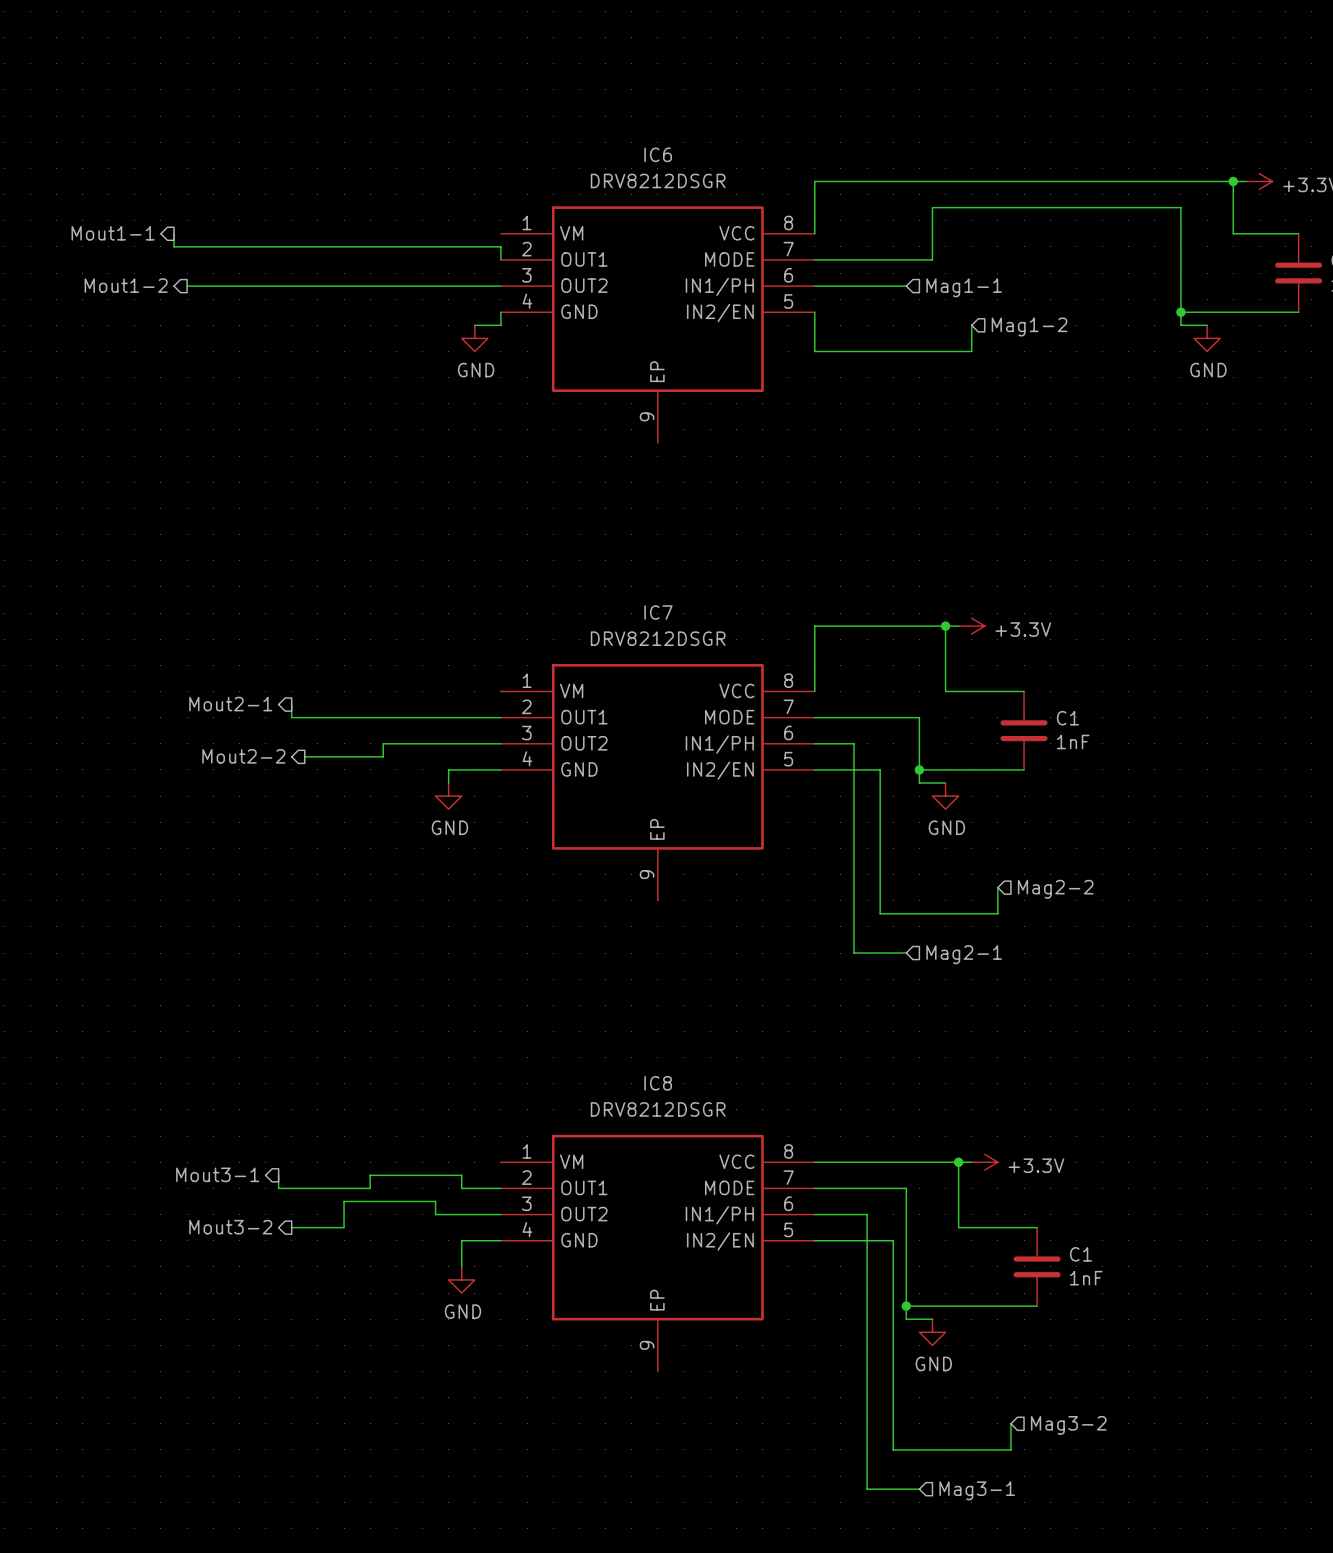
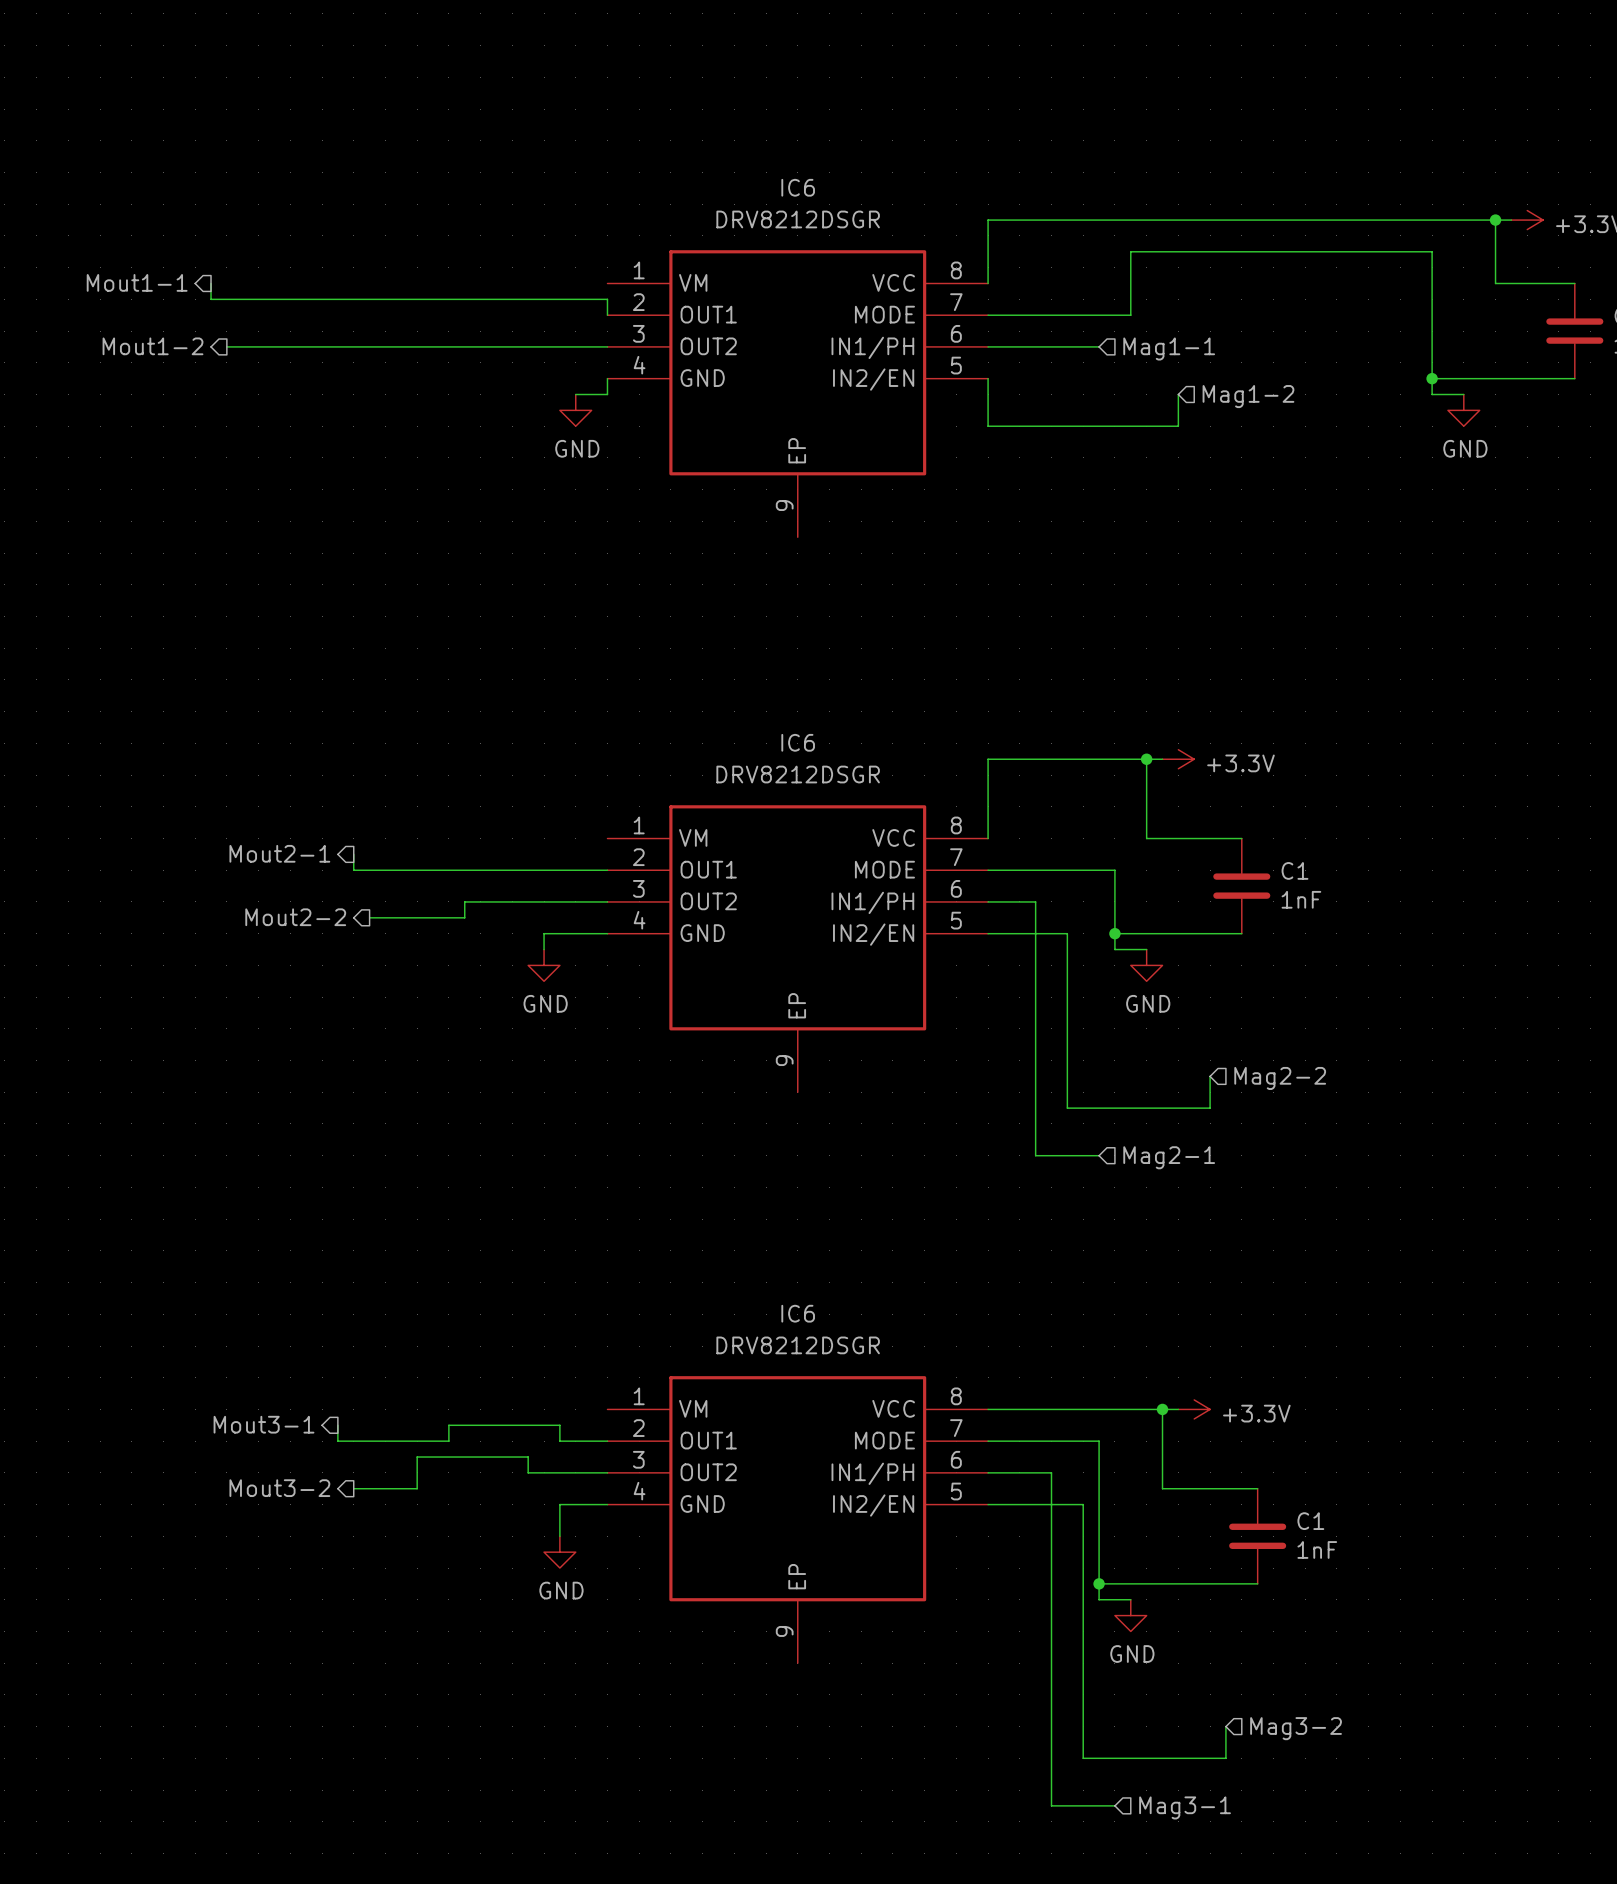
IC7 name: IC7 (658, 612) -> IC6 (798, 742)
IC8 name: IC8 (658, 1083) -> IC6 (798, 1313)

